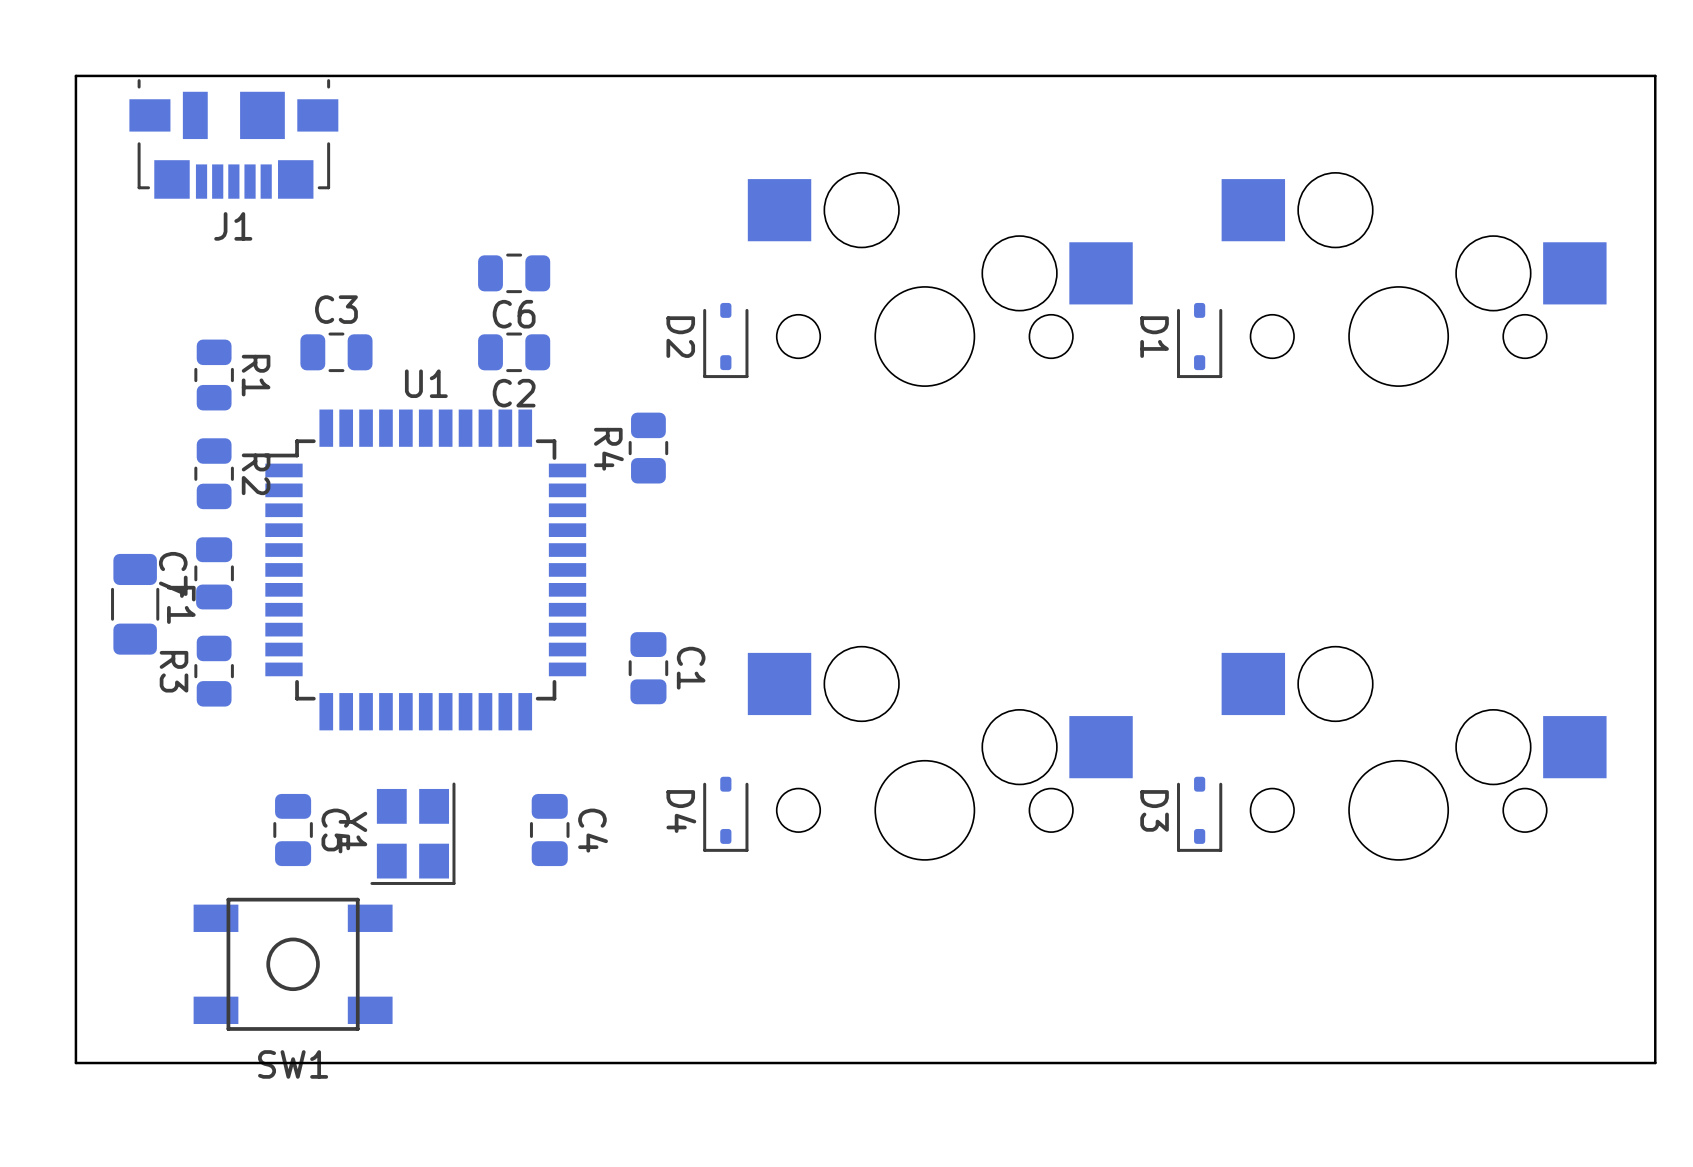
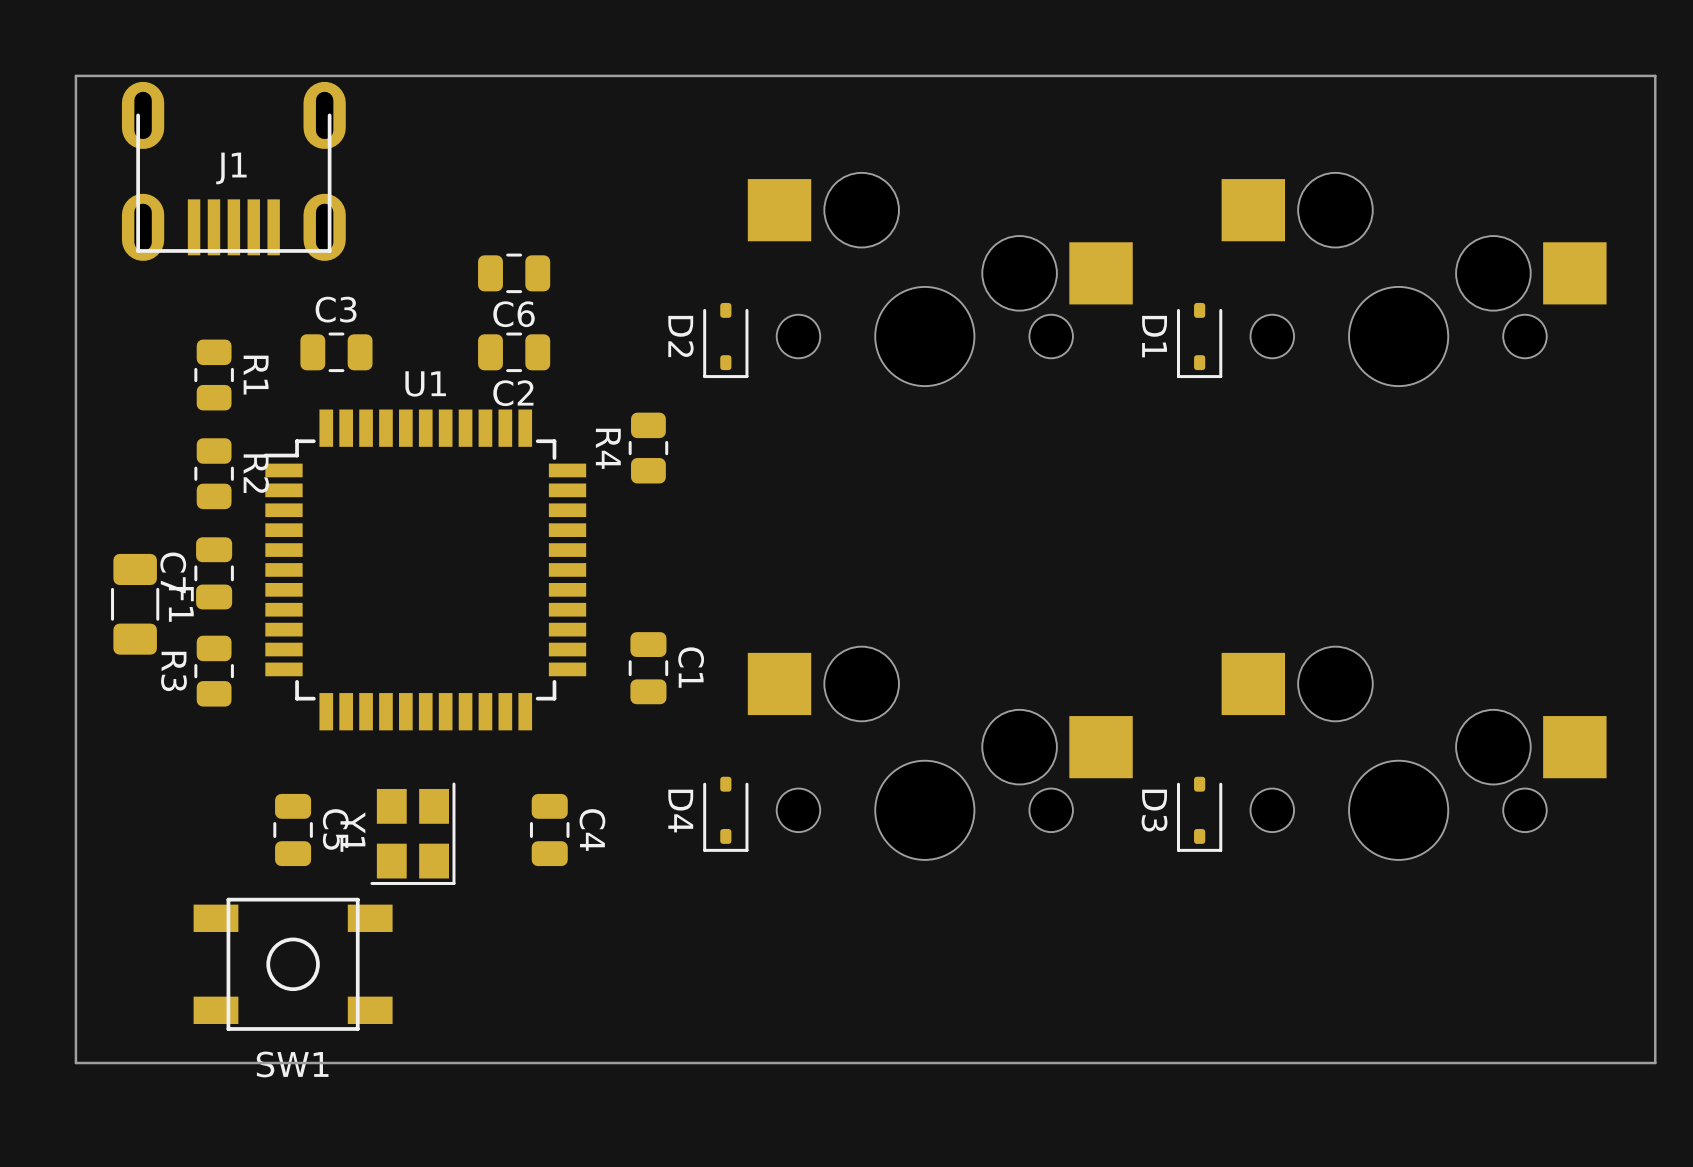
J1 footprint: [129, 79, 339, 199] -> [121, 81, 346, 261]
J1 name position: J1 (233, 226) -> J1 (231, 168)

